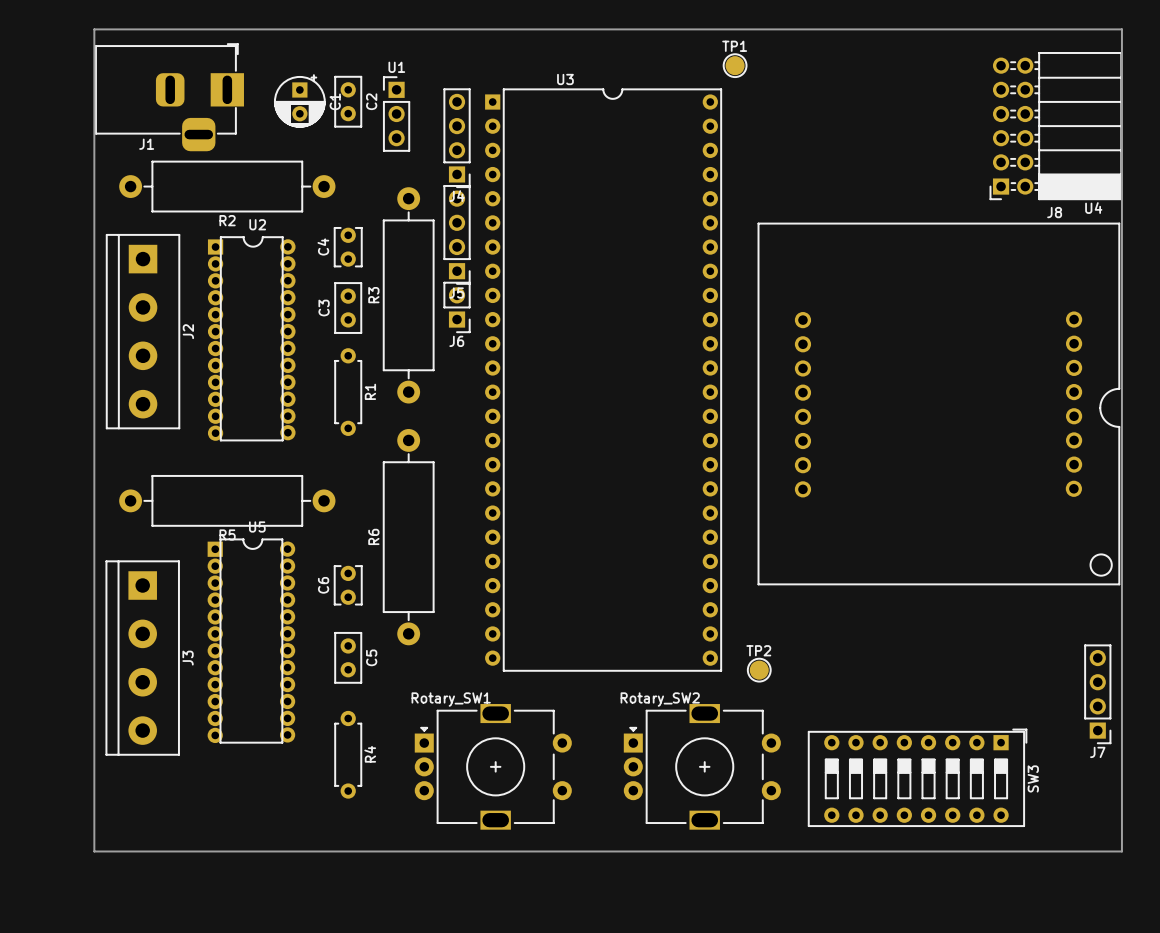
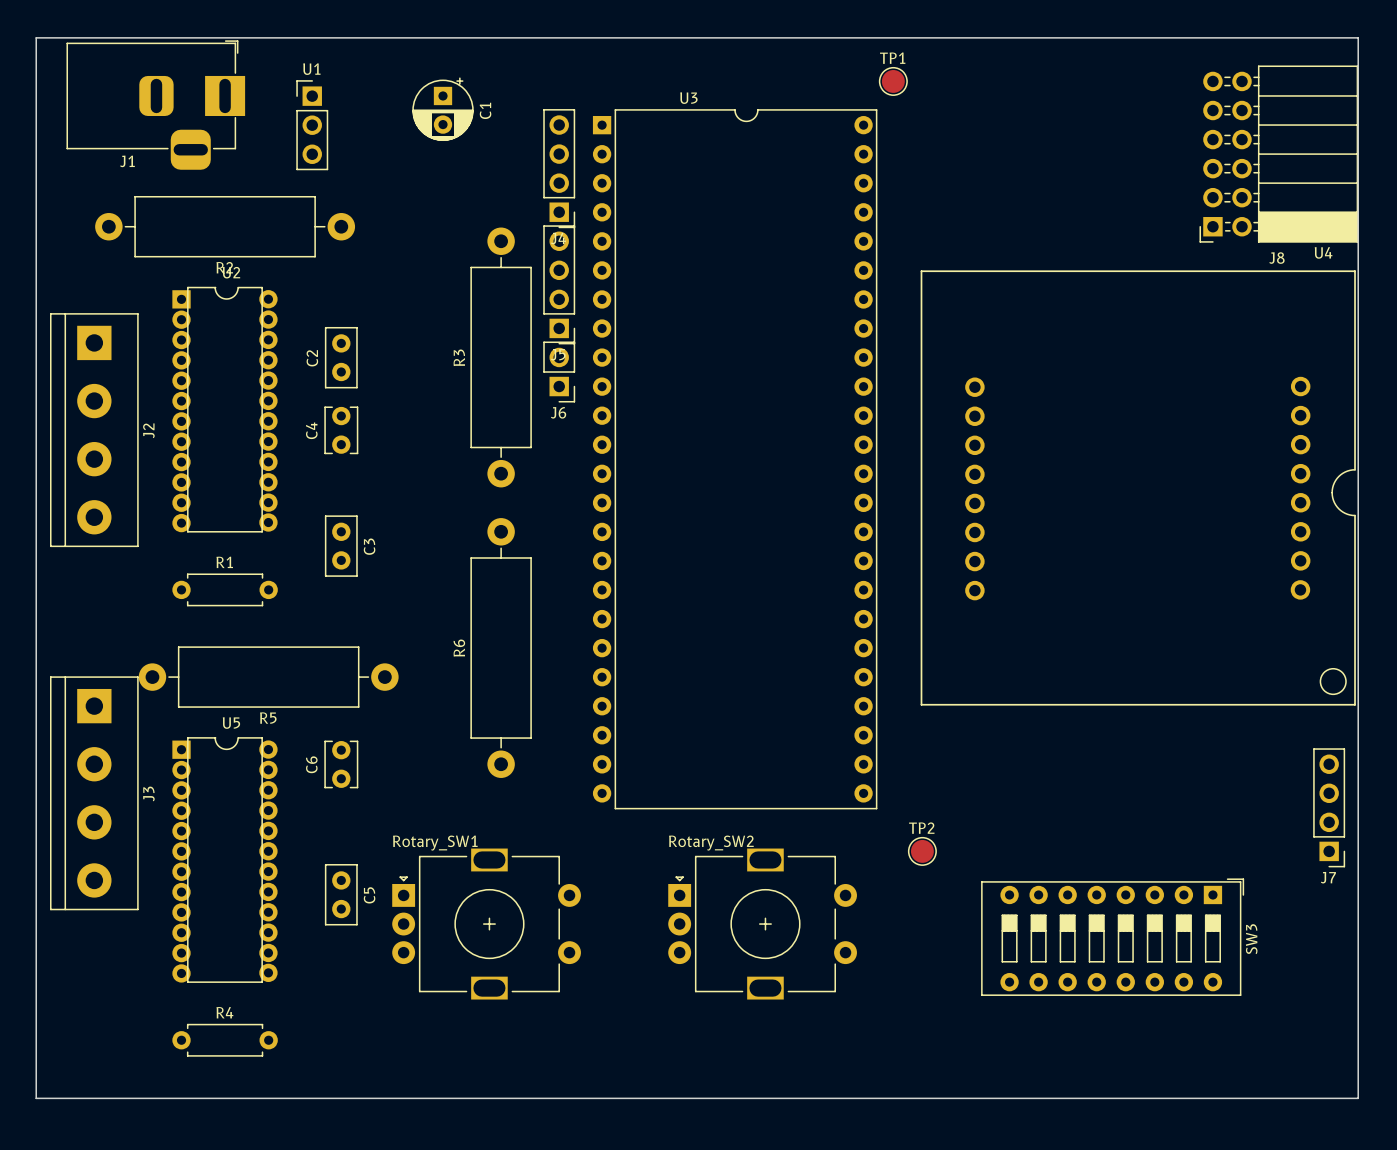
board edge: (94, 29) (94, 851) (1121, 851) -> (123, 37) (36, 37) (36, 1098) (1358, 1098) (1358, 1025)
J1 position: (169, 97) -> (155, 105)
C1 position: (299, 100) -> (443, 109)
C2 position: (348, 101) -> (341, 357)
C2 name position: C2 (371, 101) -> C2 (312, 358)
U1 position: (396, 114) -> (312, 125)
R2 position: (227, 186) -> (225, 226)
C4 position: (348, 247) -> (341, 430)
C3 name position: C3 (324, 308) -> C3 (369, 546)
C3 position: (348, 308) -> (341, 546)
J2 position: (143, 331) -> (94, 430)
U2 position: (251, 338) -> (224, 409)
R1 name position: R1 (370, 391) -> R1 (224, 562)
R1 rotation: 0° (348, 392) -> 90° clockwise (225, 589)
R1 position: (348, 392) -> (225, 589)
R5 position: (227, 500) -> (268, 677)
C6 position: (348, 585) -> (341, 764)
U5 position: (251, 641) -> (224, 860)
C5 position: (348, 657) -> (341, 894)
J3 position: (142, 658) -> (94, 793)
TP2 position: (759, 670) -> (922, 851)
J7 position: (1097, 694) -> (1329, 807)
R4 rotation: 0° (348, 754) -> 90° clockwise (225, 1040)
R4 position: (348, 754) -> (225, 1040)
R4 name position: R4 (370, 754) -> R4 (224, 1012)
Rotary_SW1 position: (493, 766) -> (486, 924)
Rotary_SW2 position: (702, 766) -> (762, 924)

